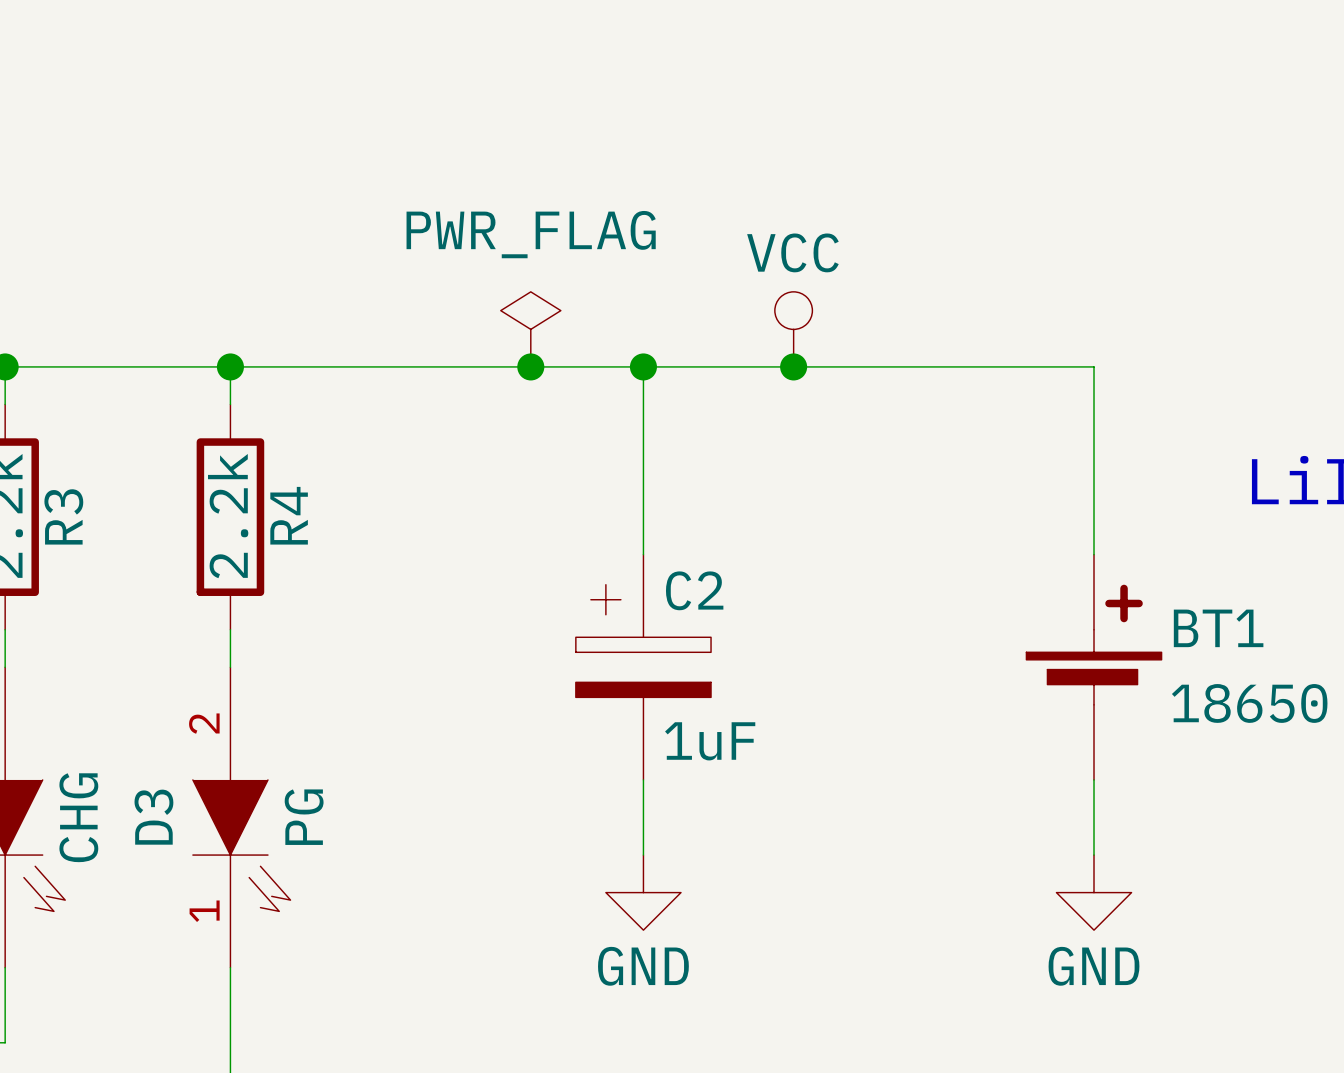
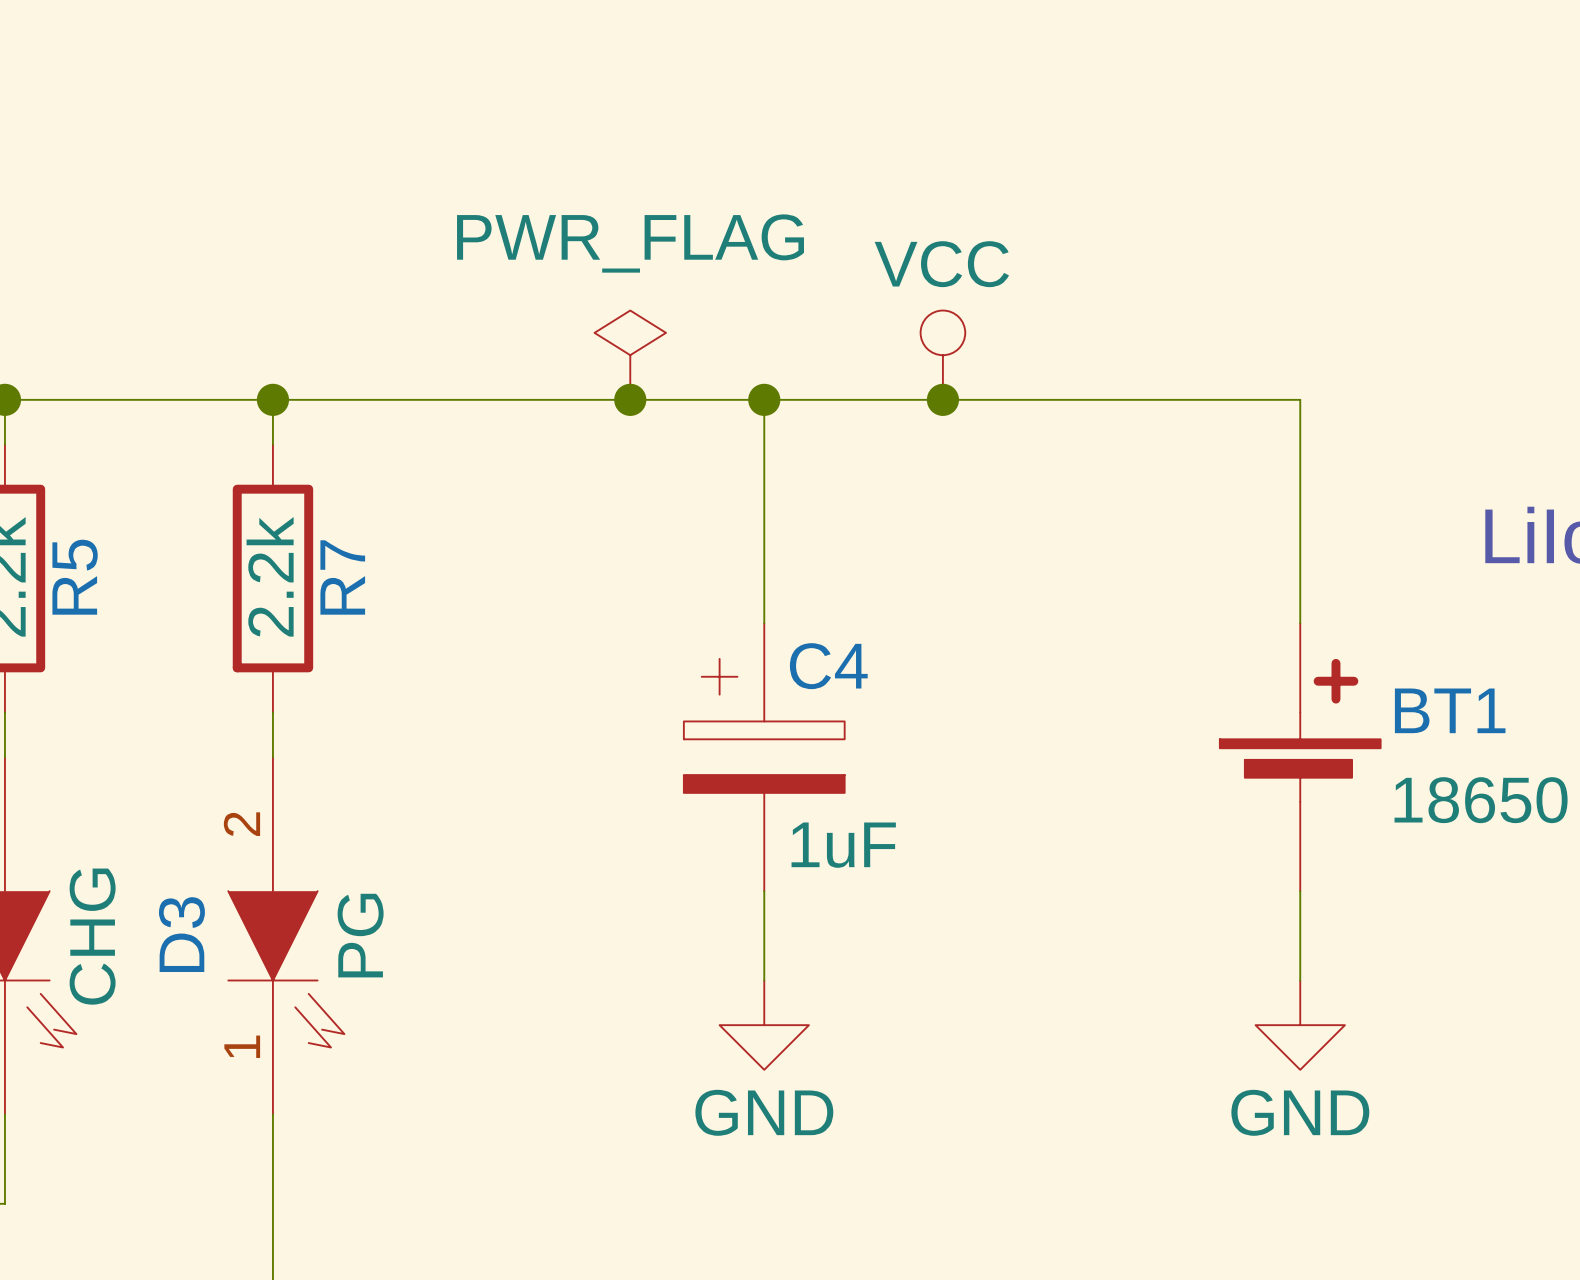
R4 name: R4 (289, 515) -> R7 (342, 577)
R3 name: R3 (63, 516) -> R5 (75, 577)
C2 name: C2 (694, 590) -> C4 (828, 666)

